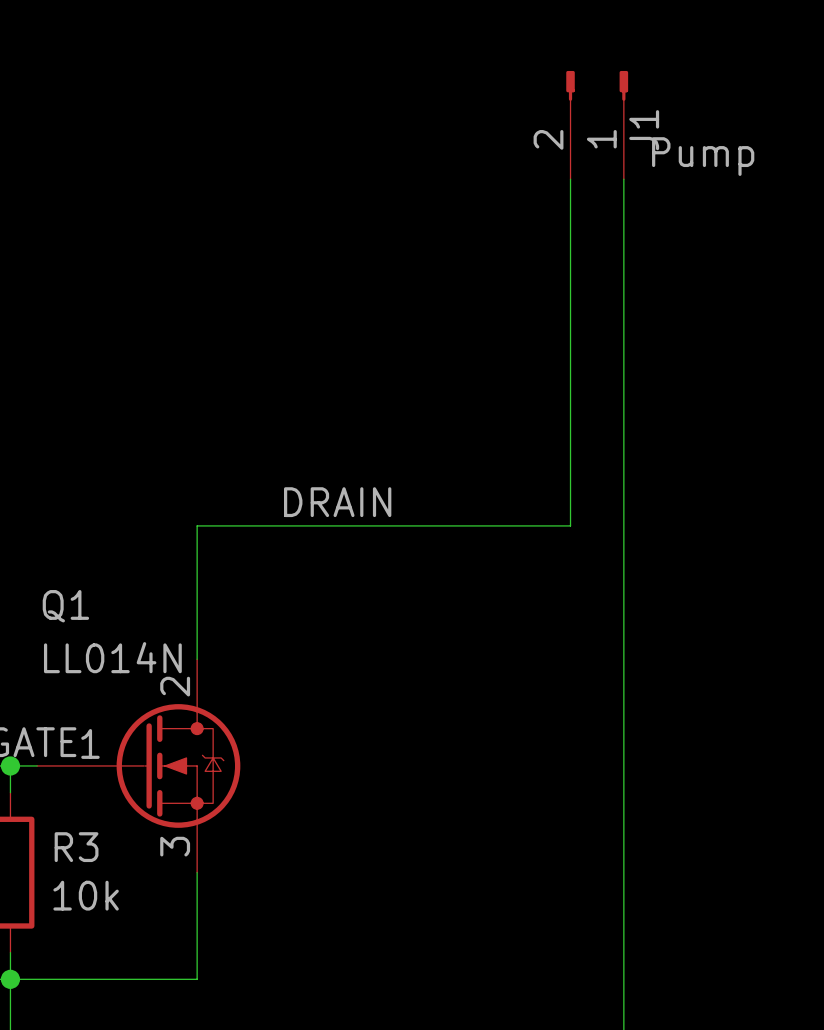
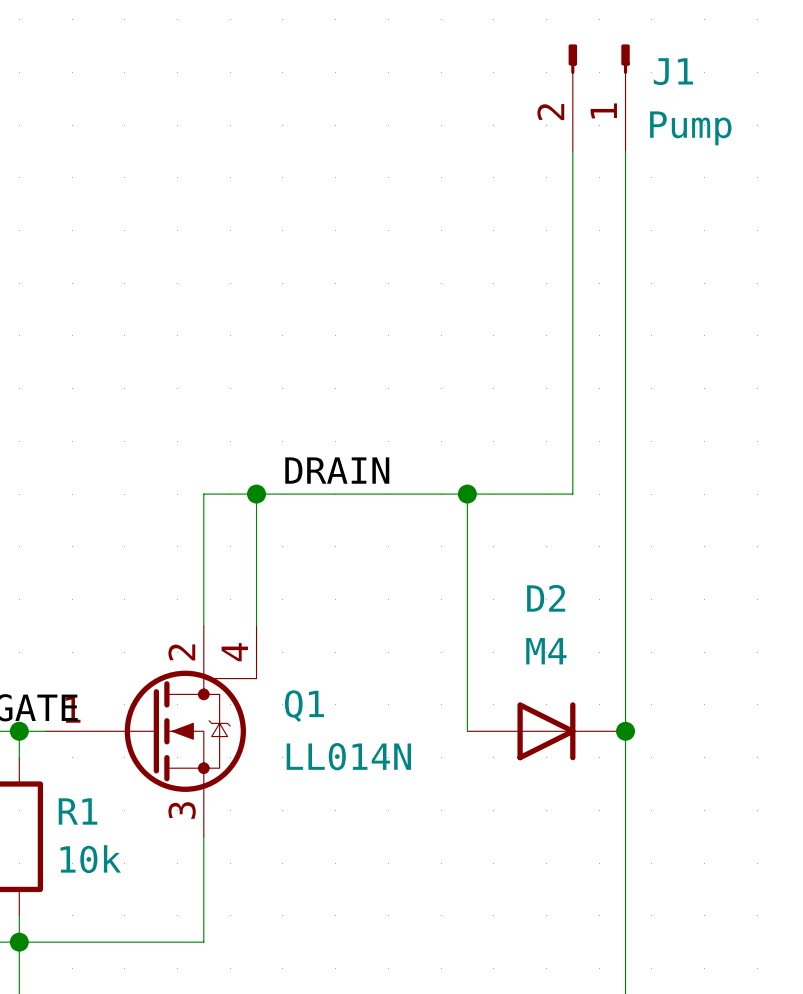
J1 name rotation: 0° (644, 130) -> 90° clockwise (673, 71)
wire: none -> (256, 494) (256, 625)
junction: none -> (256, 494)
wire: none -> (467, 494) (467, 731)
junction: none -> (467, 494)
Q1 name position: Q1 (65, 606) -> Q1 (304, 706)
Q1 value position: LL014N (112, 657) -> LL014N (348, 756)
Q1 symbol: [37, 659, 241, 873] -> [45, 625, 257, 837]
D2: none -> M4 (546, 731)
junction: none -> (625, 731)
R3 name: R3 (76, 847) -> R1 (78, 811)

